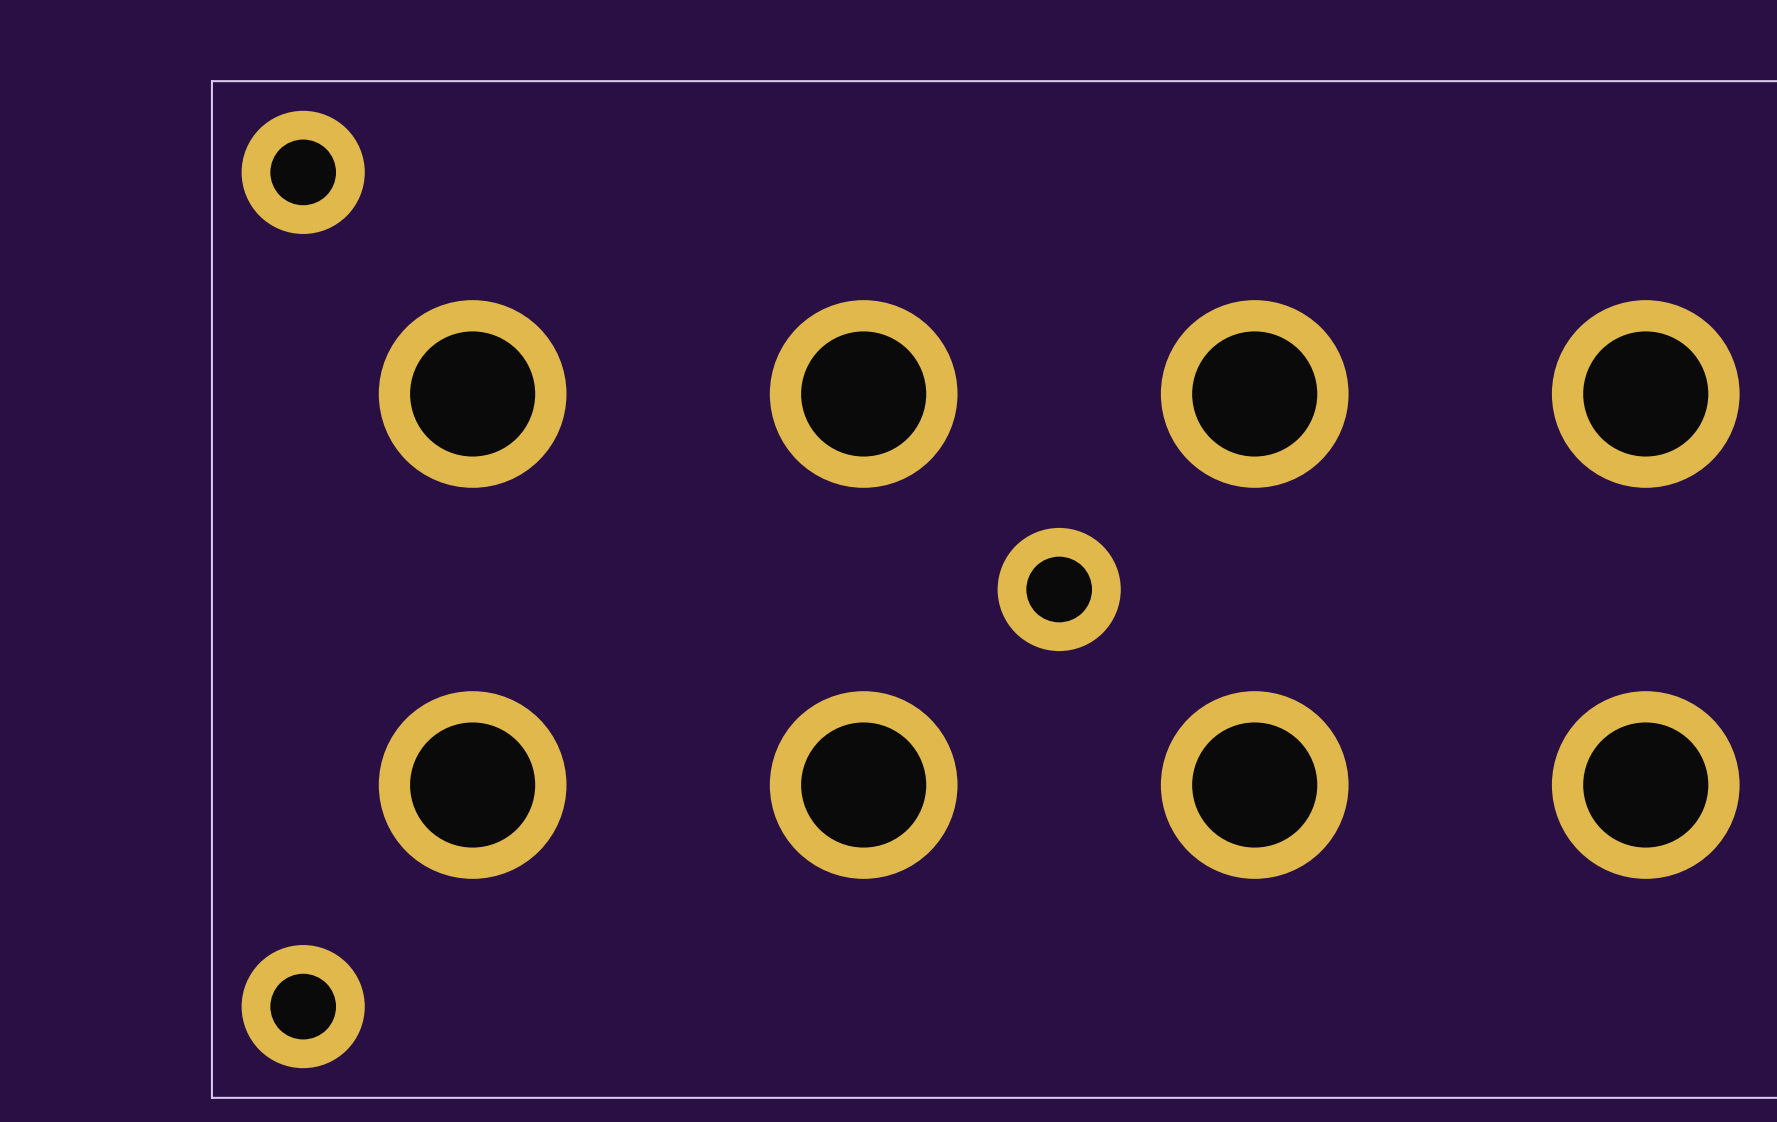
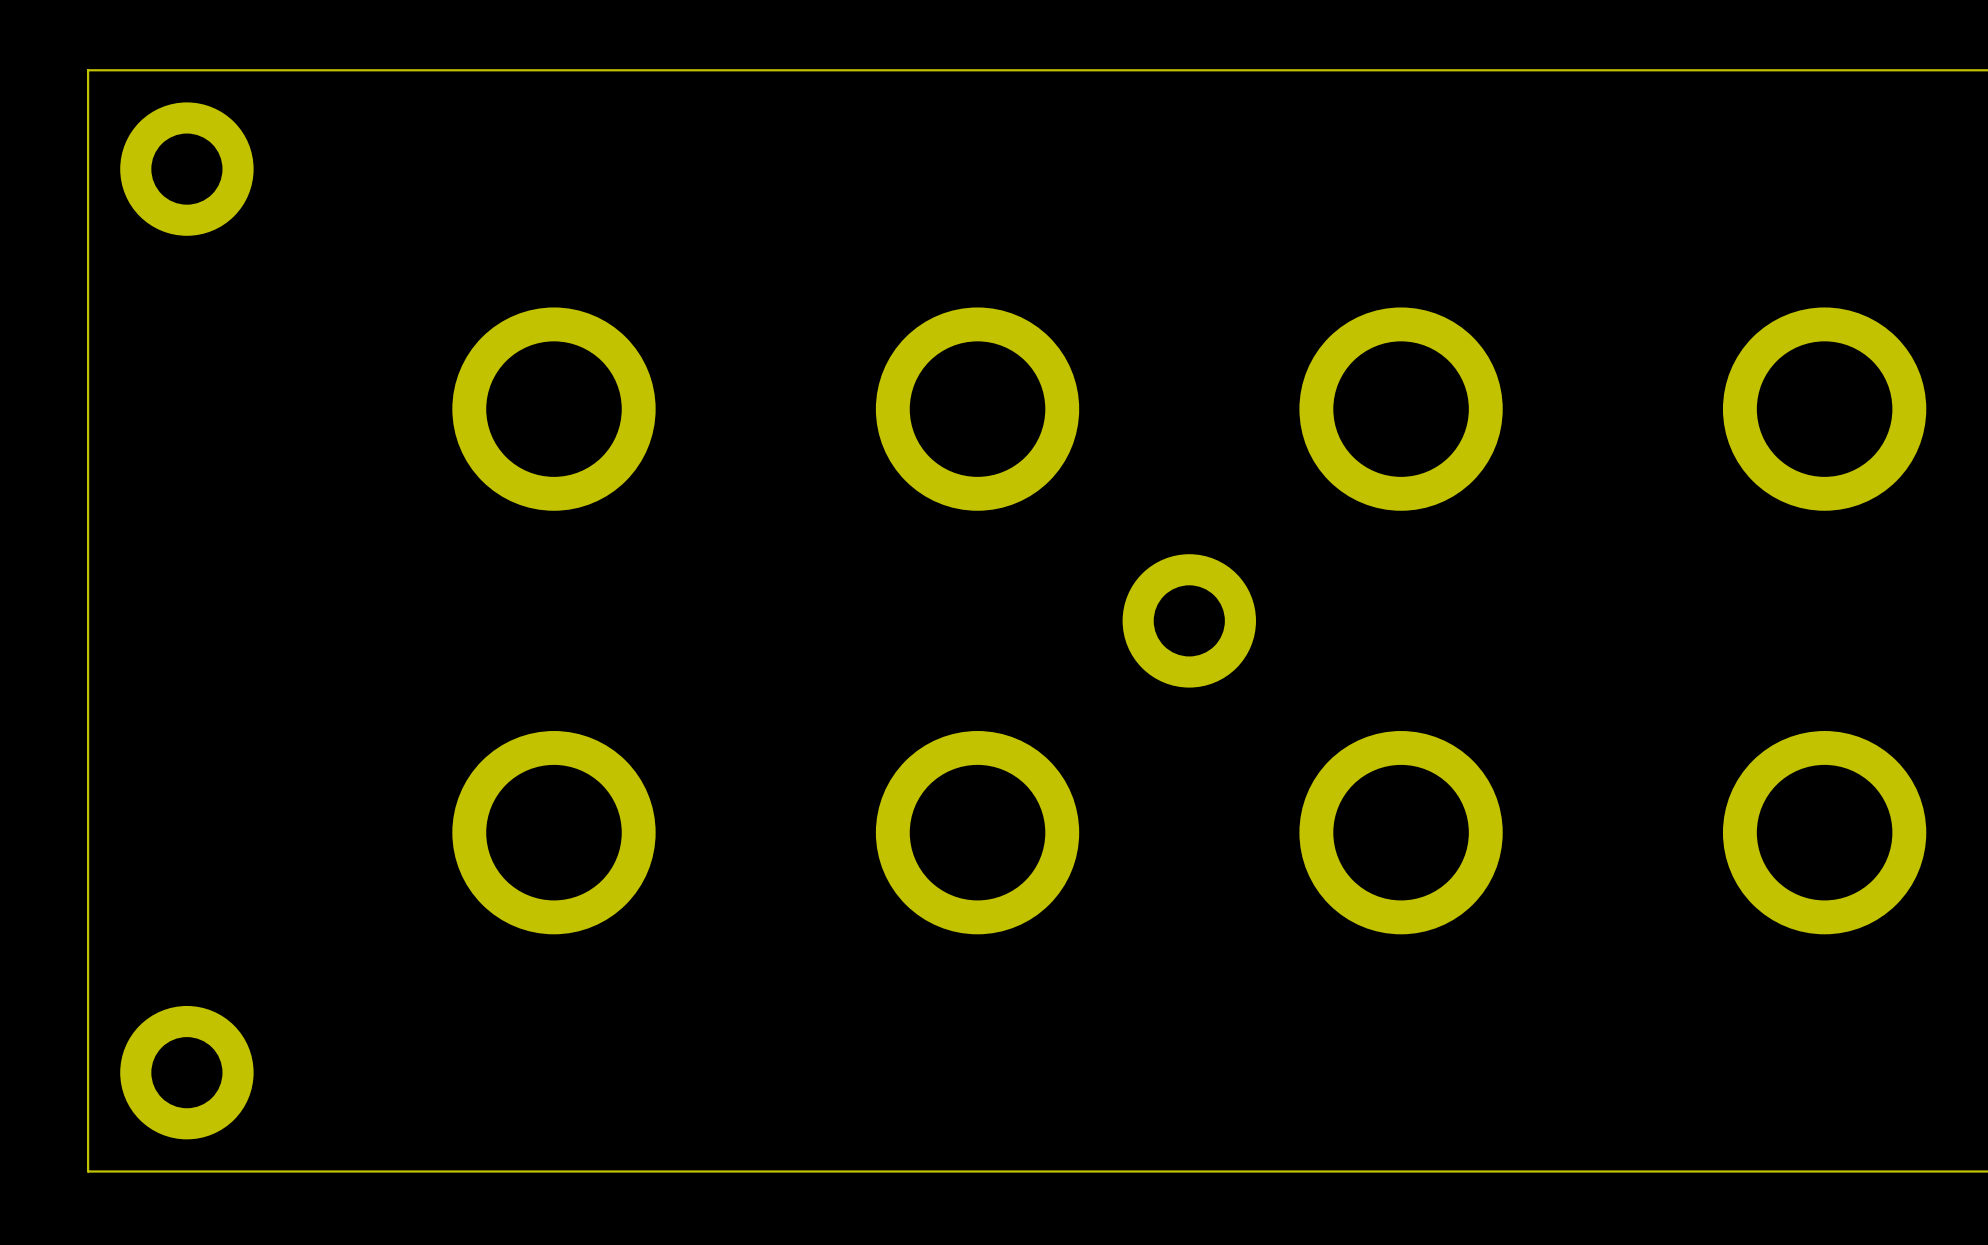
board edge: (211, 81) (211, 1097) -> (271, 70) (88, 70) (88, 1171) (271, 1171)
part position: (303, 172) -> (186, 169)
part position: (303, 1006) -> (186, 1072)

